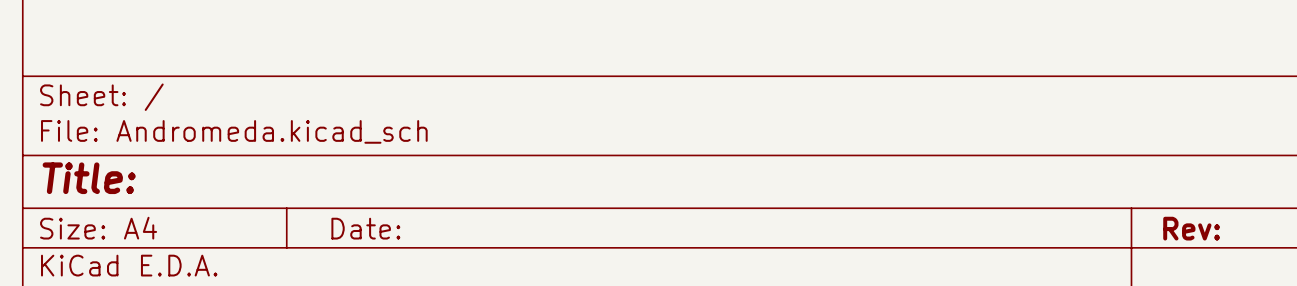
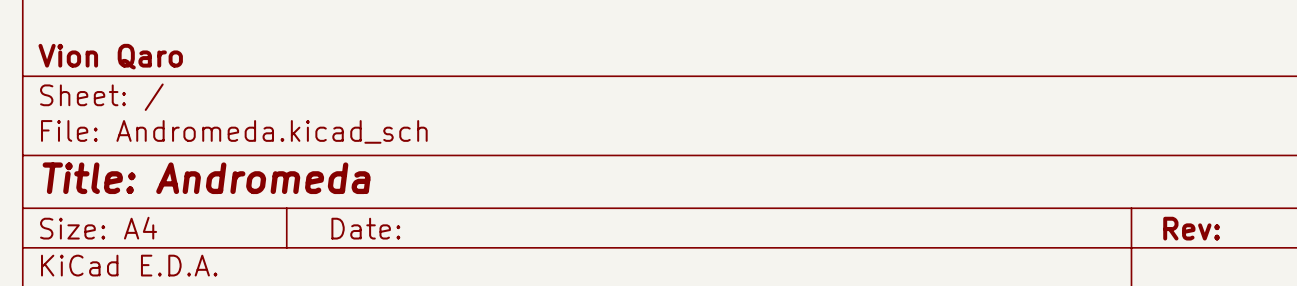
title block: none -> Vion Qaro (110, 56)
title block: Title: (89, 178) -> Title: Andromeda (206, 178)

